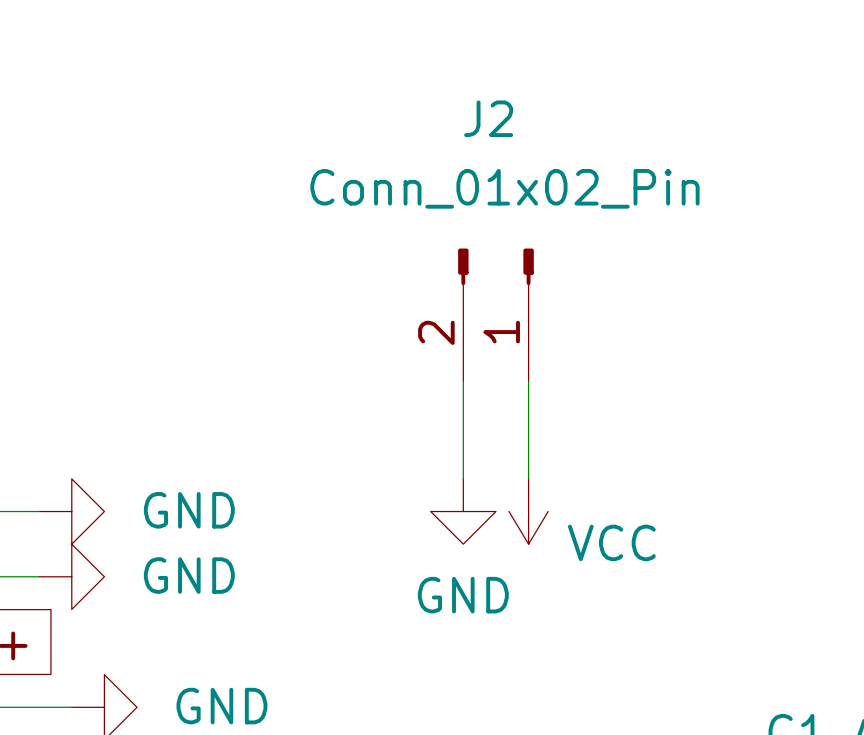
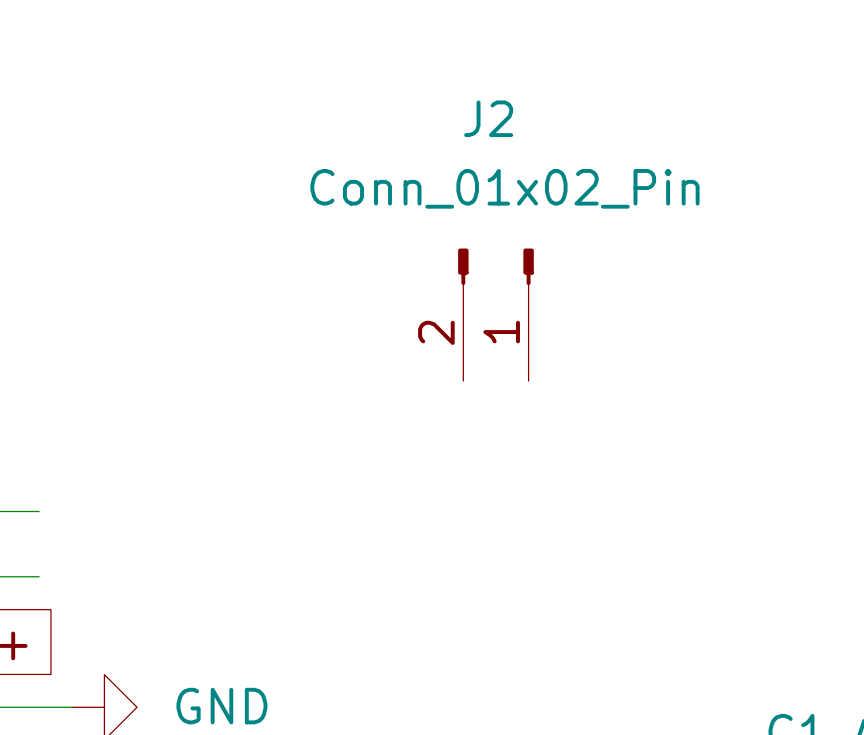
wire: (463, 381) (463, 478) -> none
wire: (528, 381) (528, 478) -> none
power symbol: GND (71, 511) -> none
power symbol: GND (463, 511) -> none
power symbol: VCC (528, 511) -> none
power symbol: GND (71, 576) -> none

